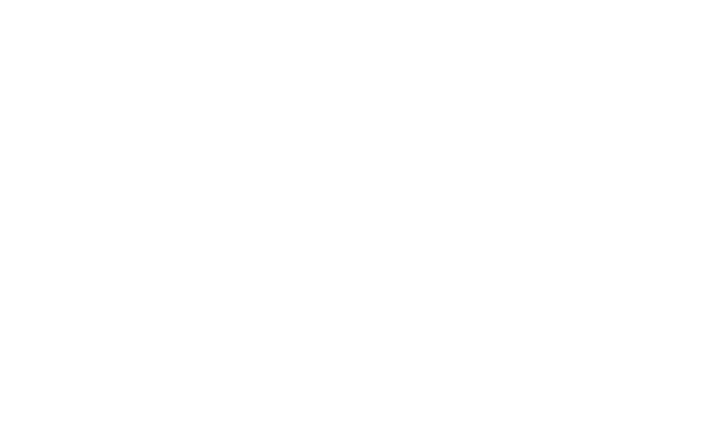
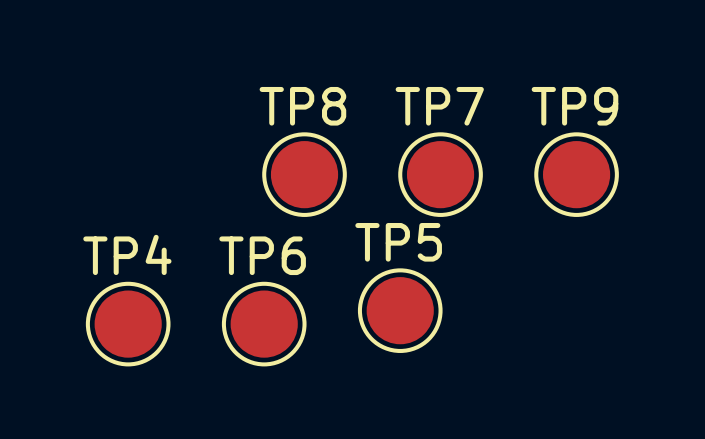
TP8: none -> (304, 174)
TP7: none -> (440, 174)
TP9: none -> (576, 174)
TP5: none -> (400, 310)
TP4: none -> (128, 324)
TP6: none -> (264, 324)

